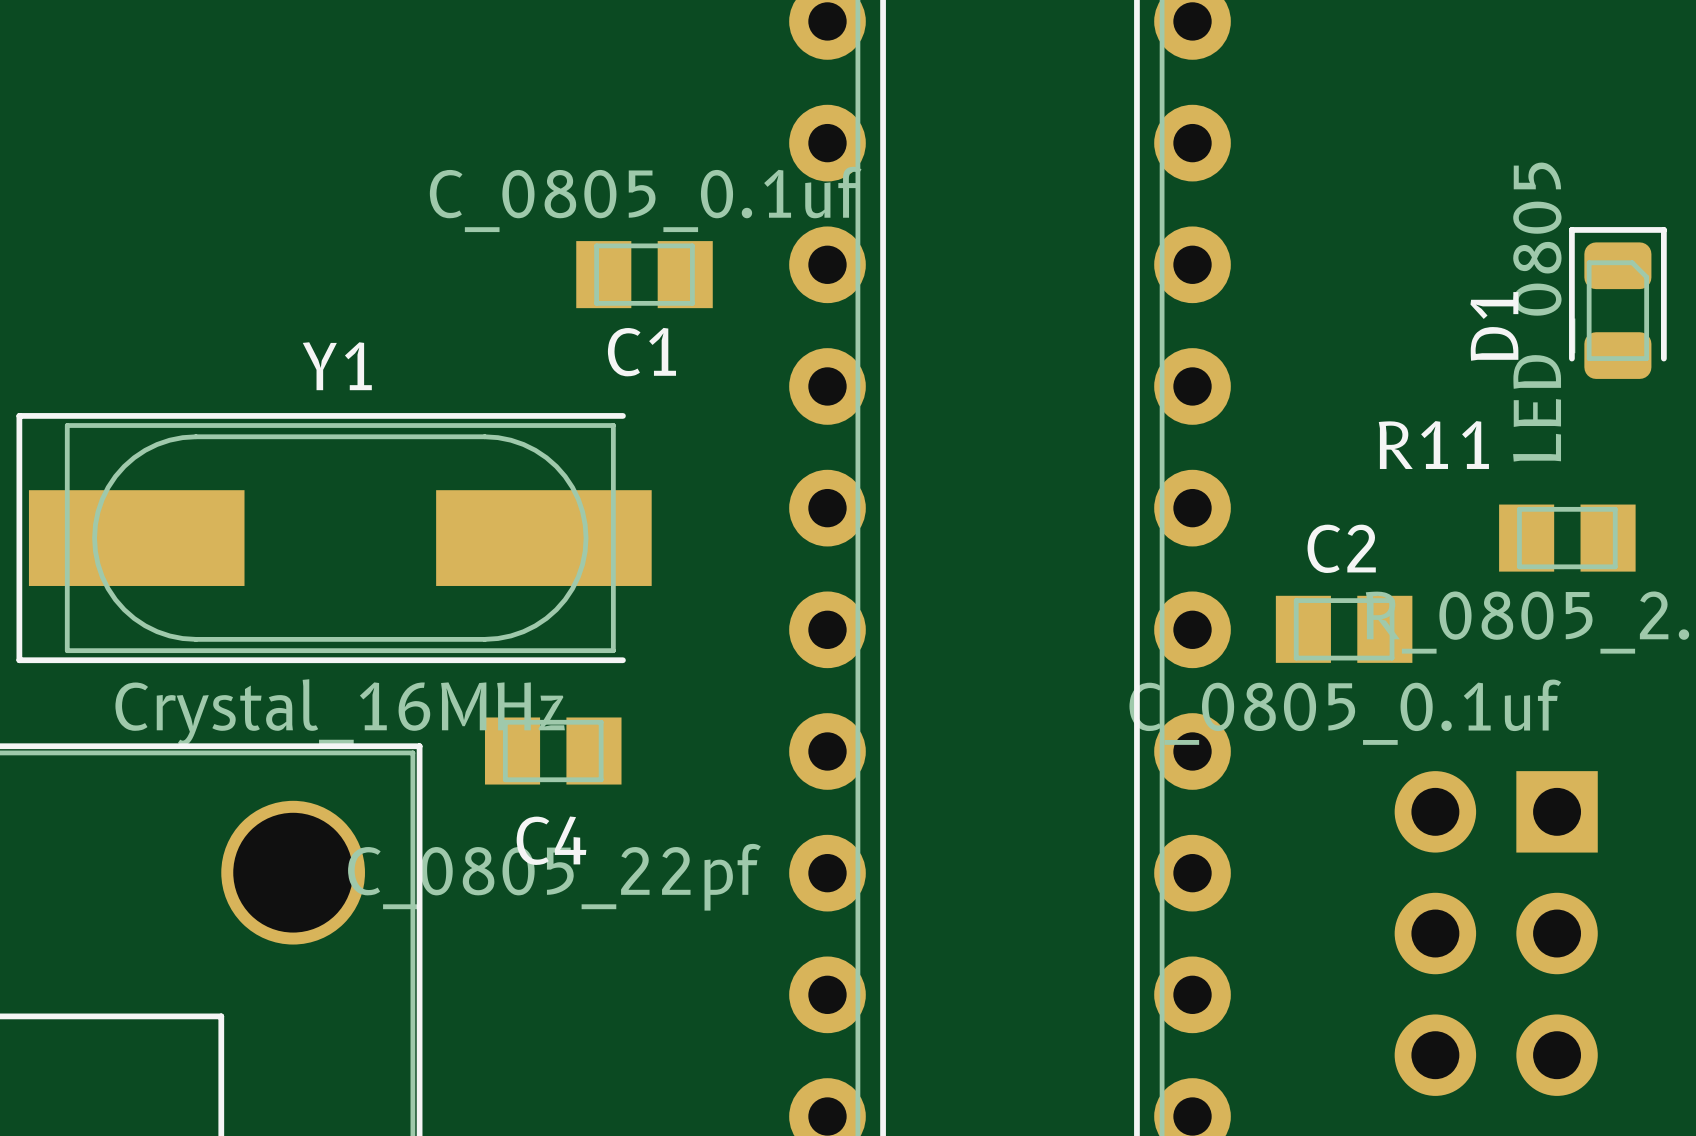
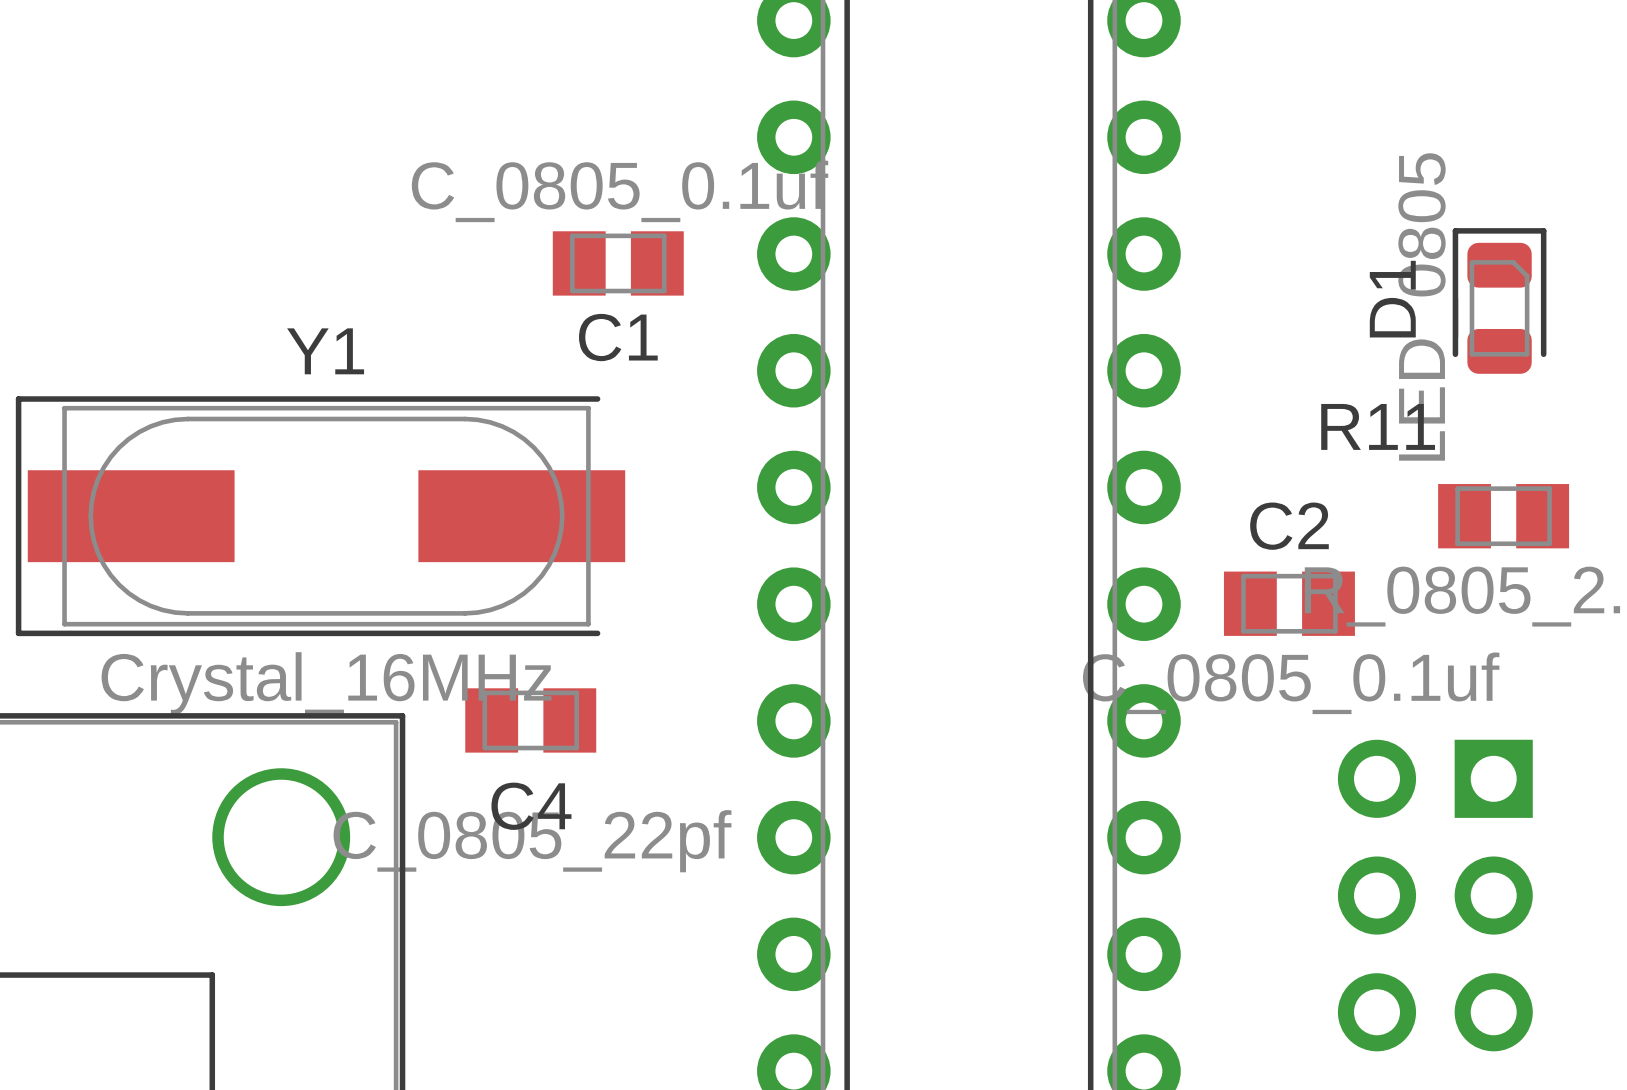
D1 position: (1617, 303) -> (1499, 300)
D1 name position: D1 (1494, 326) -> D1 (1392, 299)

